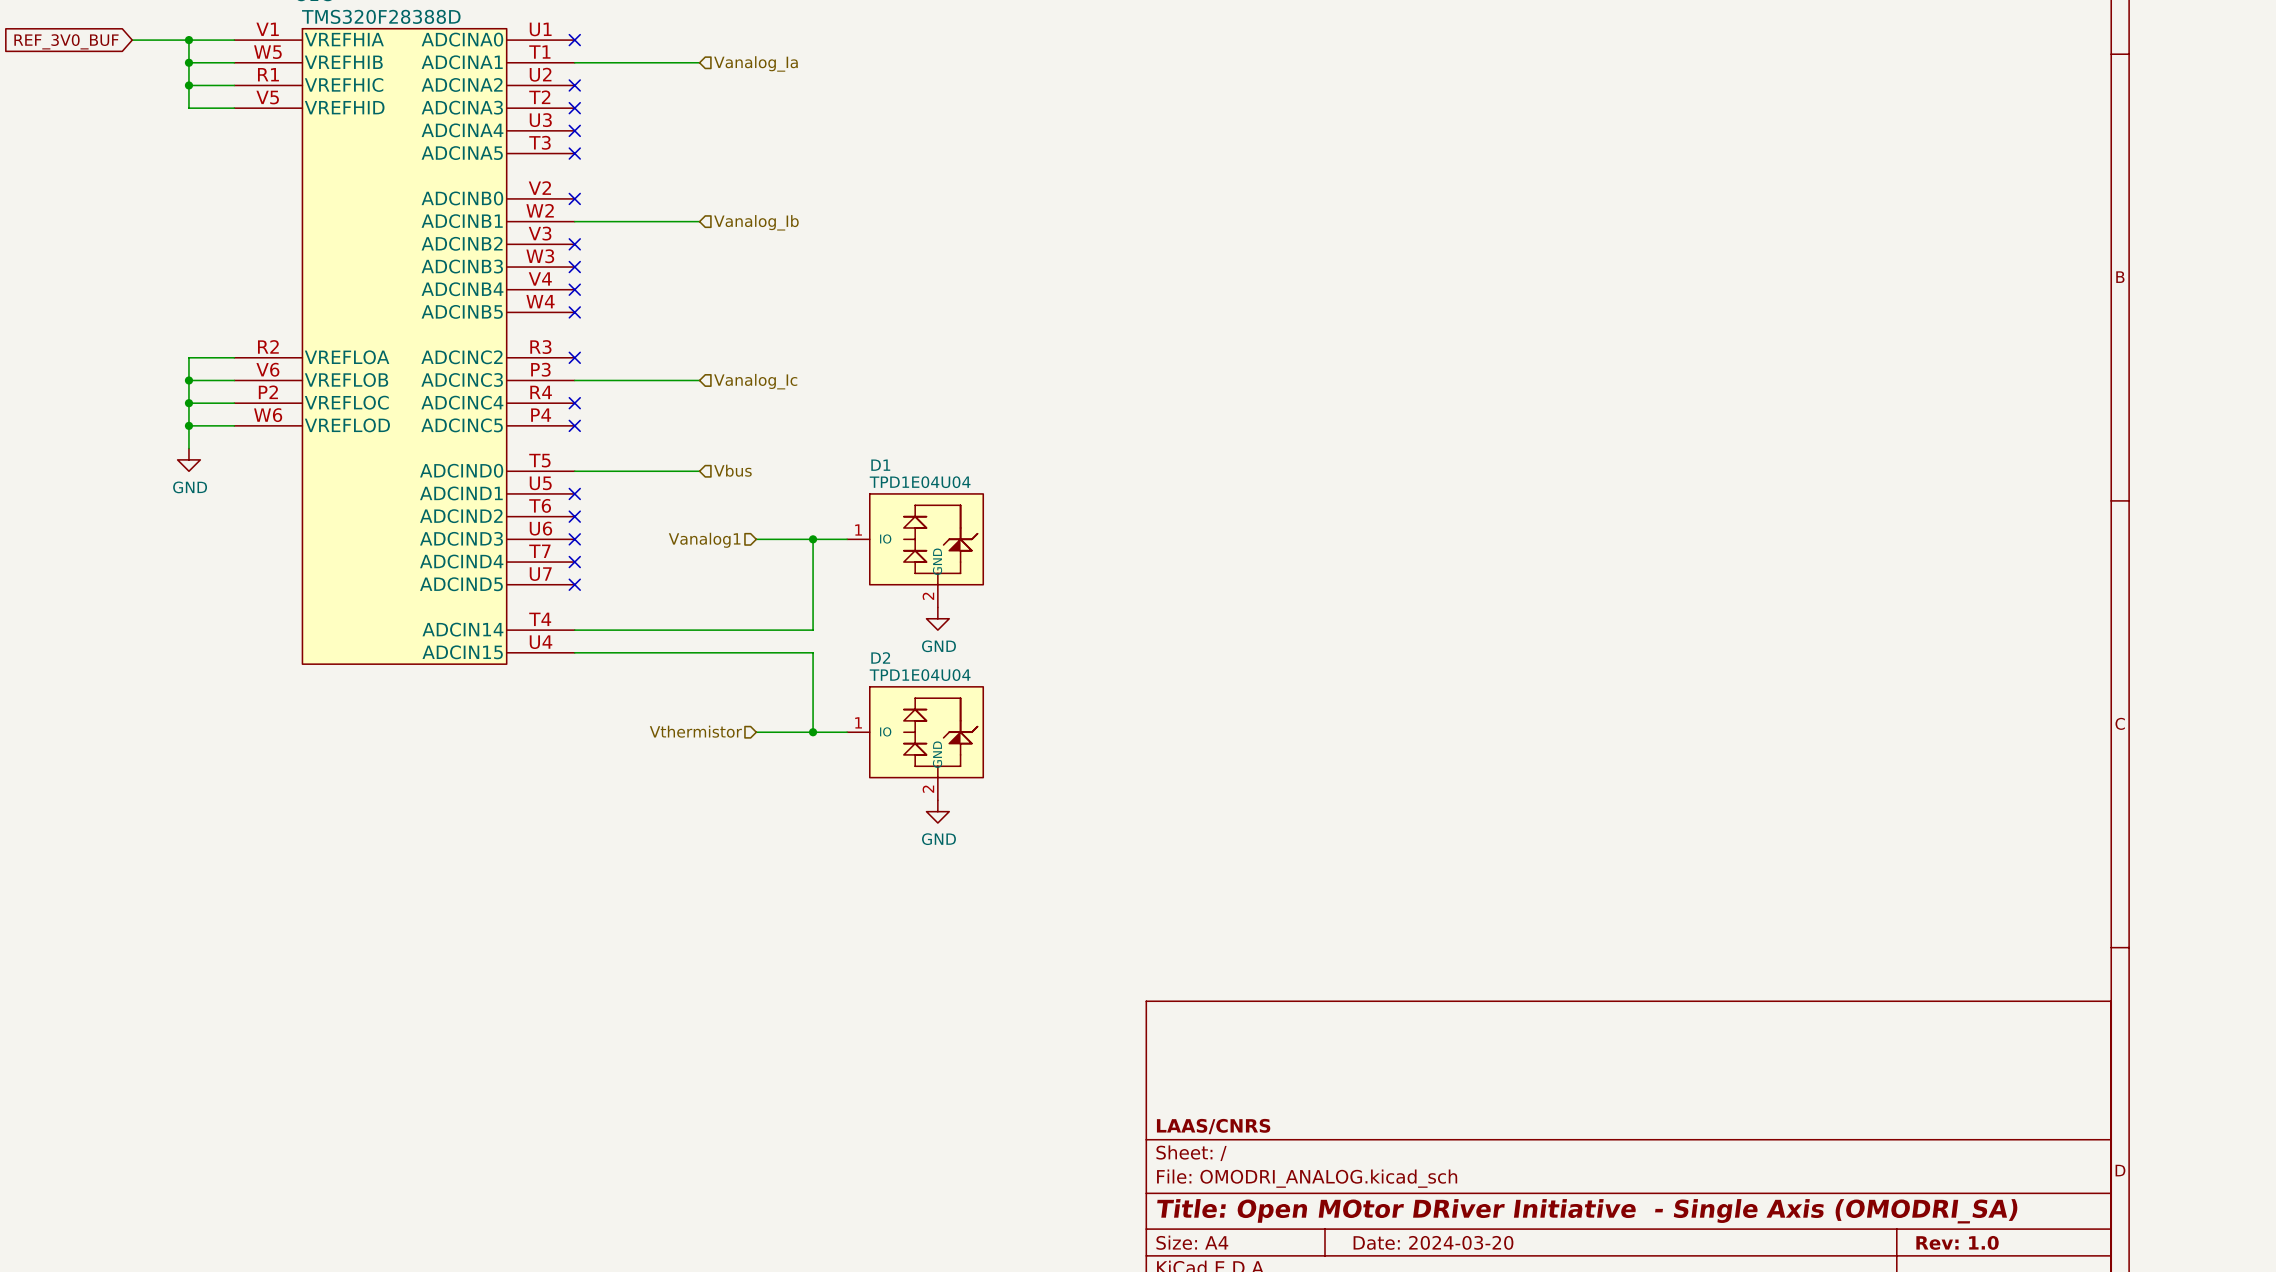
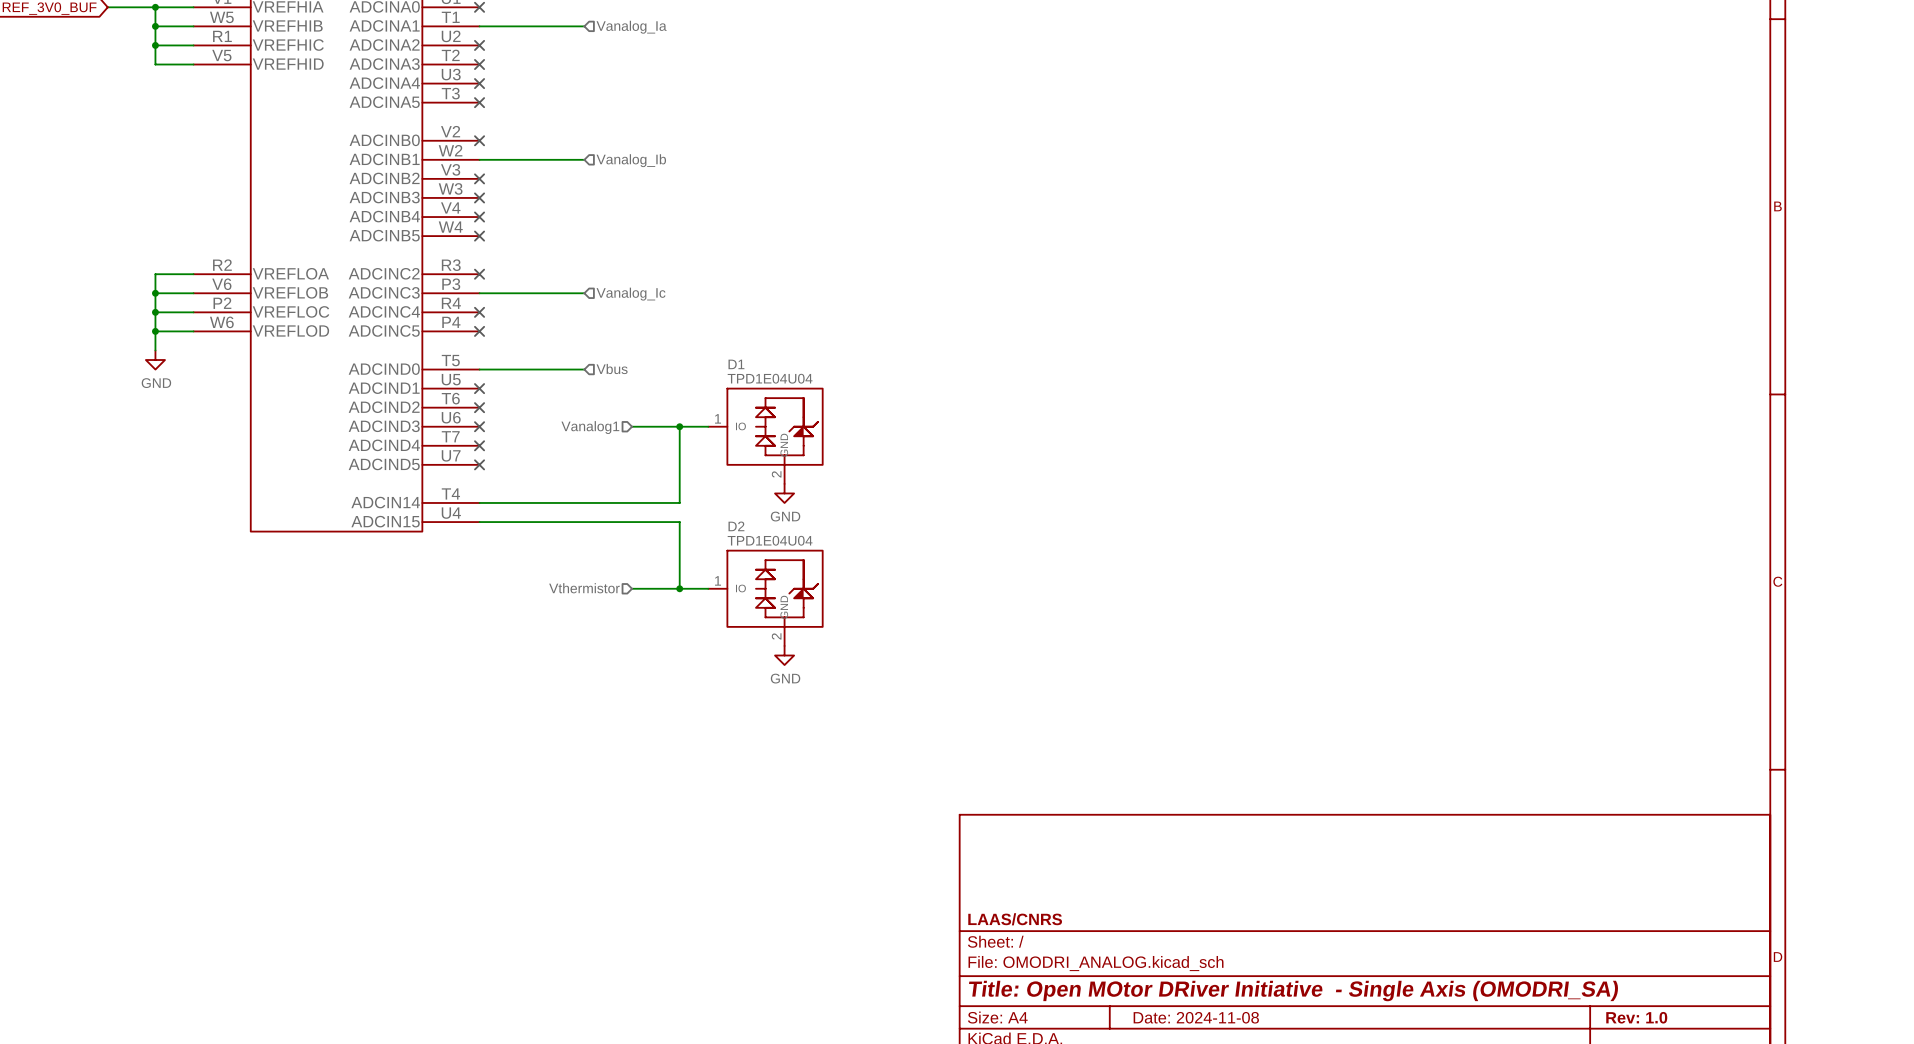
title block: Date: 2024-03-20 (1433, 1242) -> Date: 2024-11-08 (1196, 1017)

